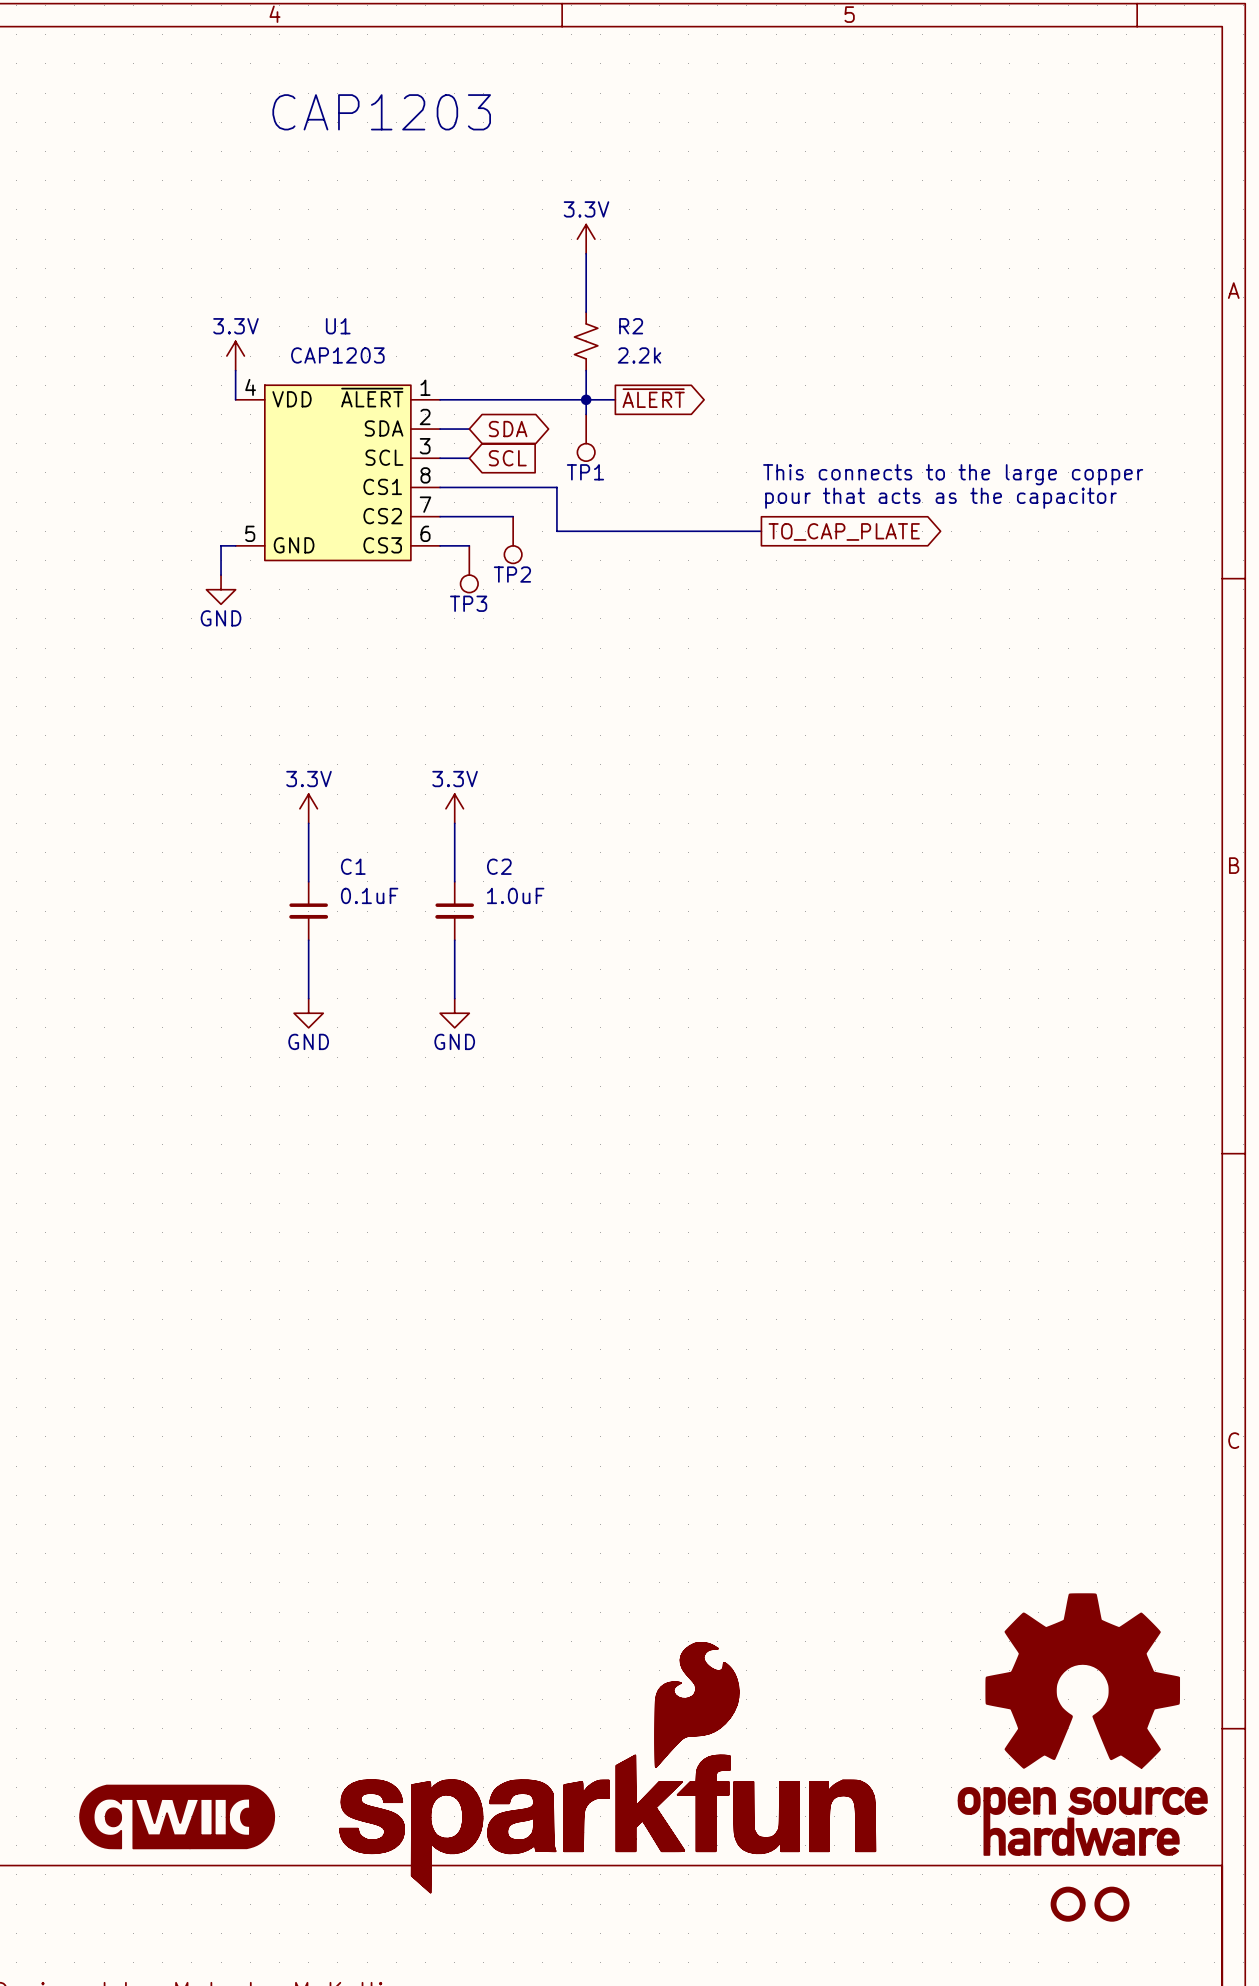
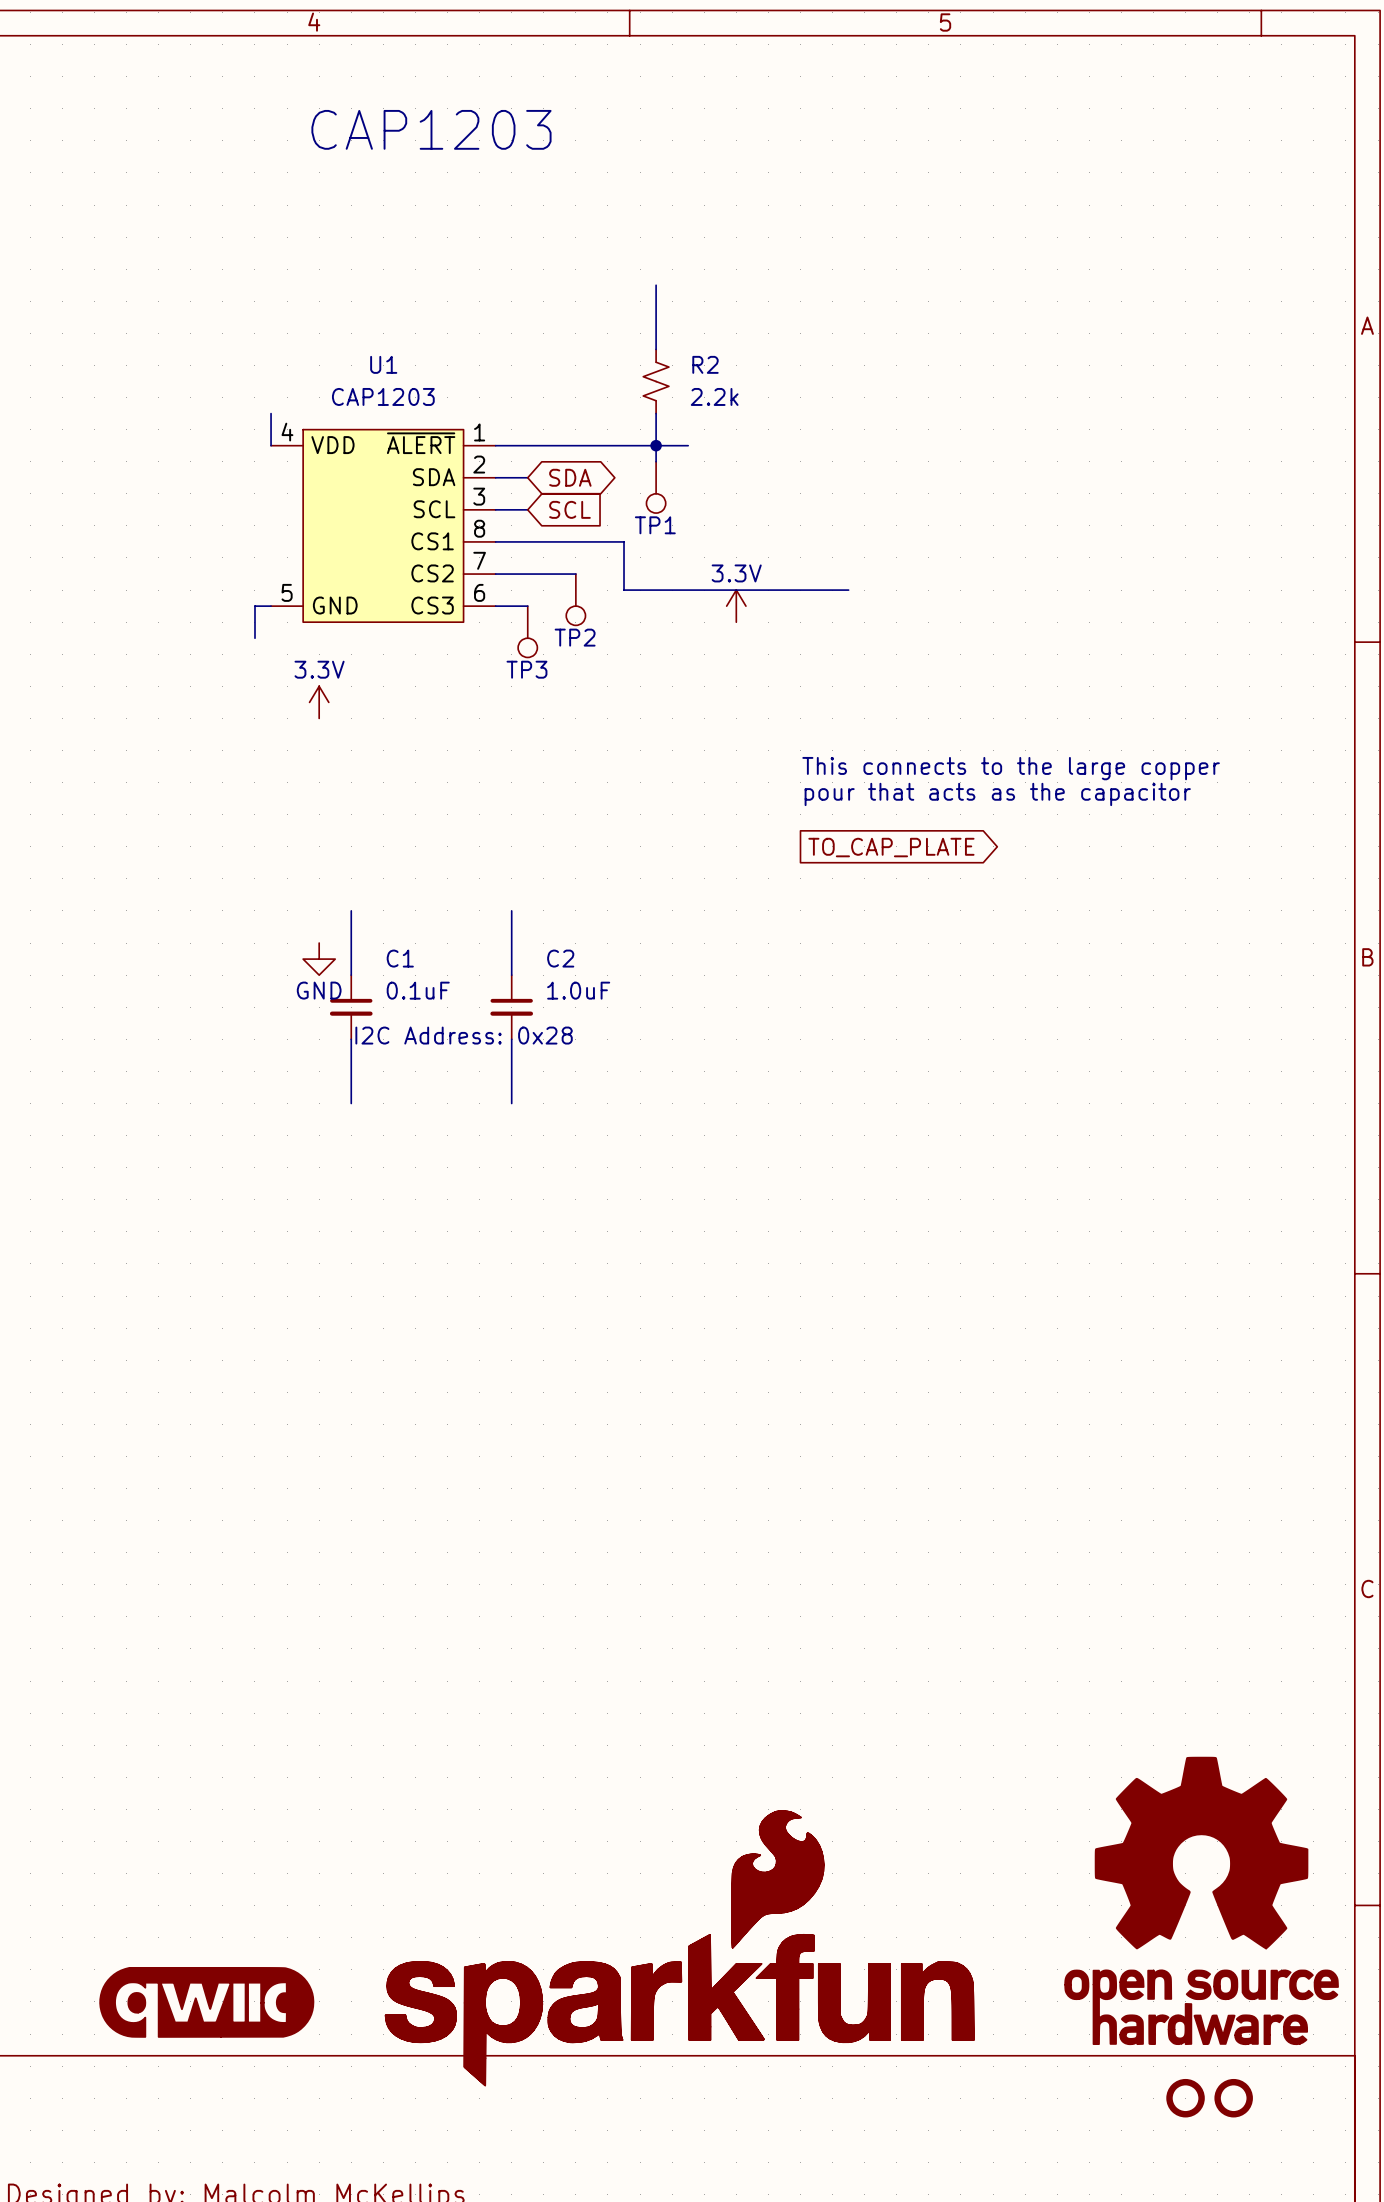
power symbol: 3.3V (586, 239) -> none
power symbol: 3.3V (235, 356) -> none
global label: ~{ALERT} (653, 398) -> none
text position: This connects to the large copper (953, 474) -> This connects to the large copper (1011, 768)
text position: pour that acts as the capacitor (940, 498) -> pour that acts as the capacitor (997, 794)
global label position: TO_CAP_PLATE (844, 531) -> TO_CAP_PLATE (891, 847)
power symbol: none -> 3.3V (736, 606)
power symbol: GND (221, 589) -> none
power symbol: none -> 3.3V (319, 702)
power symbol: 3.3V (308, 808) -> none
power symbol: 3.3V (454, 808) -> none
power symbol: none -> GND (319, 959)
text: none -> I2C Address: 0x28 (464, 1035)
power symbol: GND (308, 1013) -> none
power symbol: GND (454, 1013) -> none

